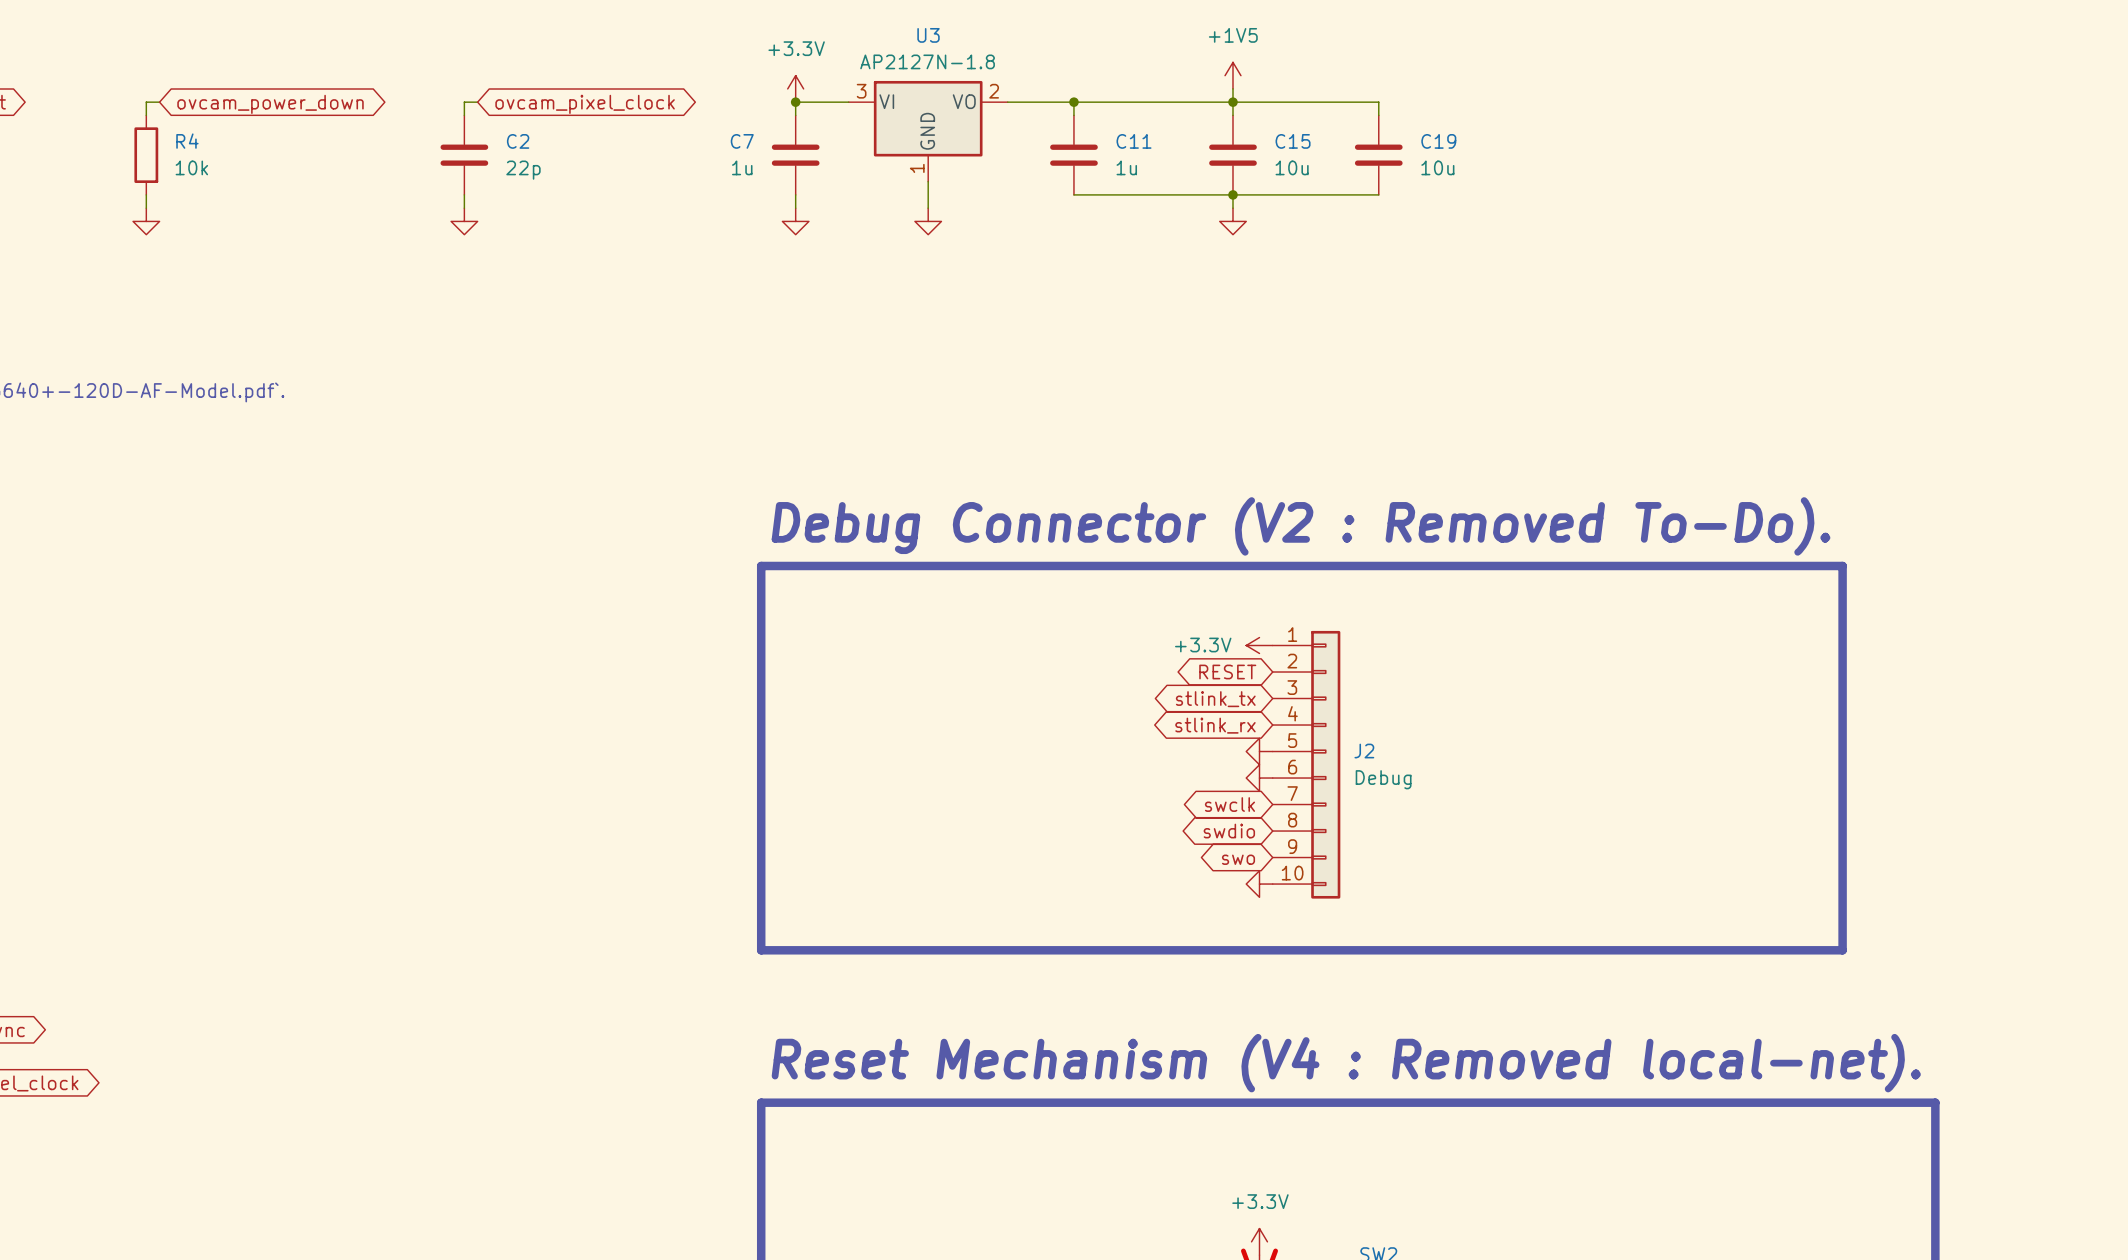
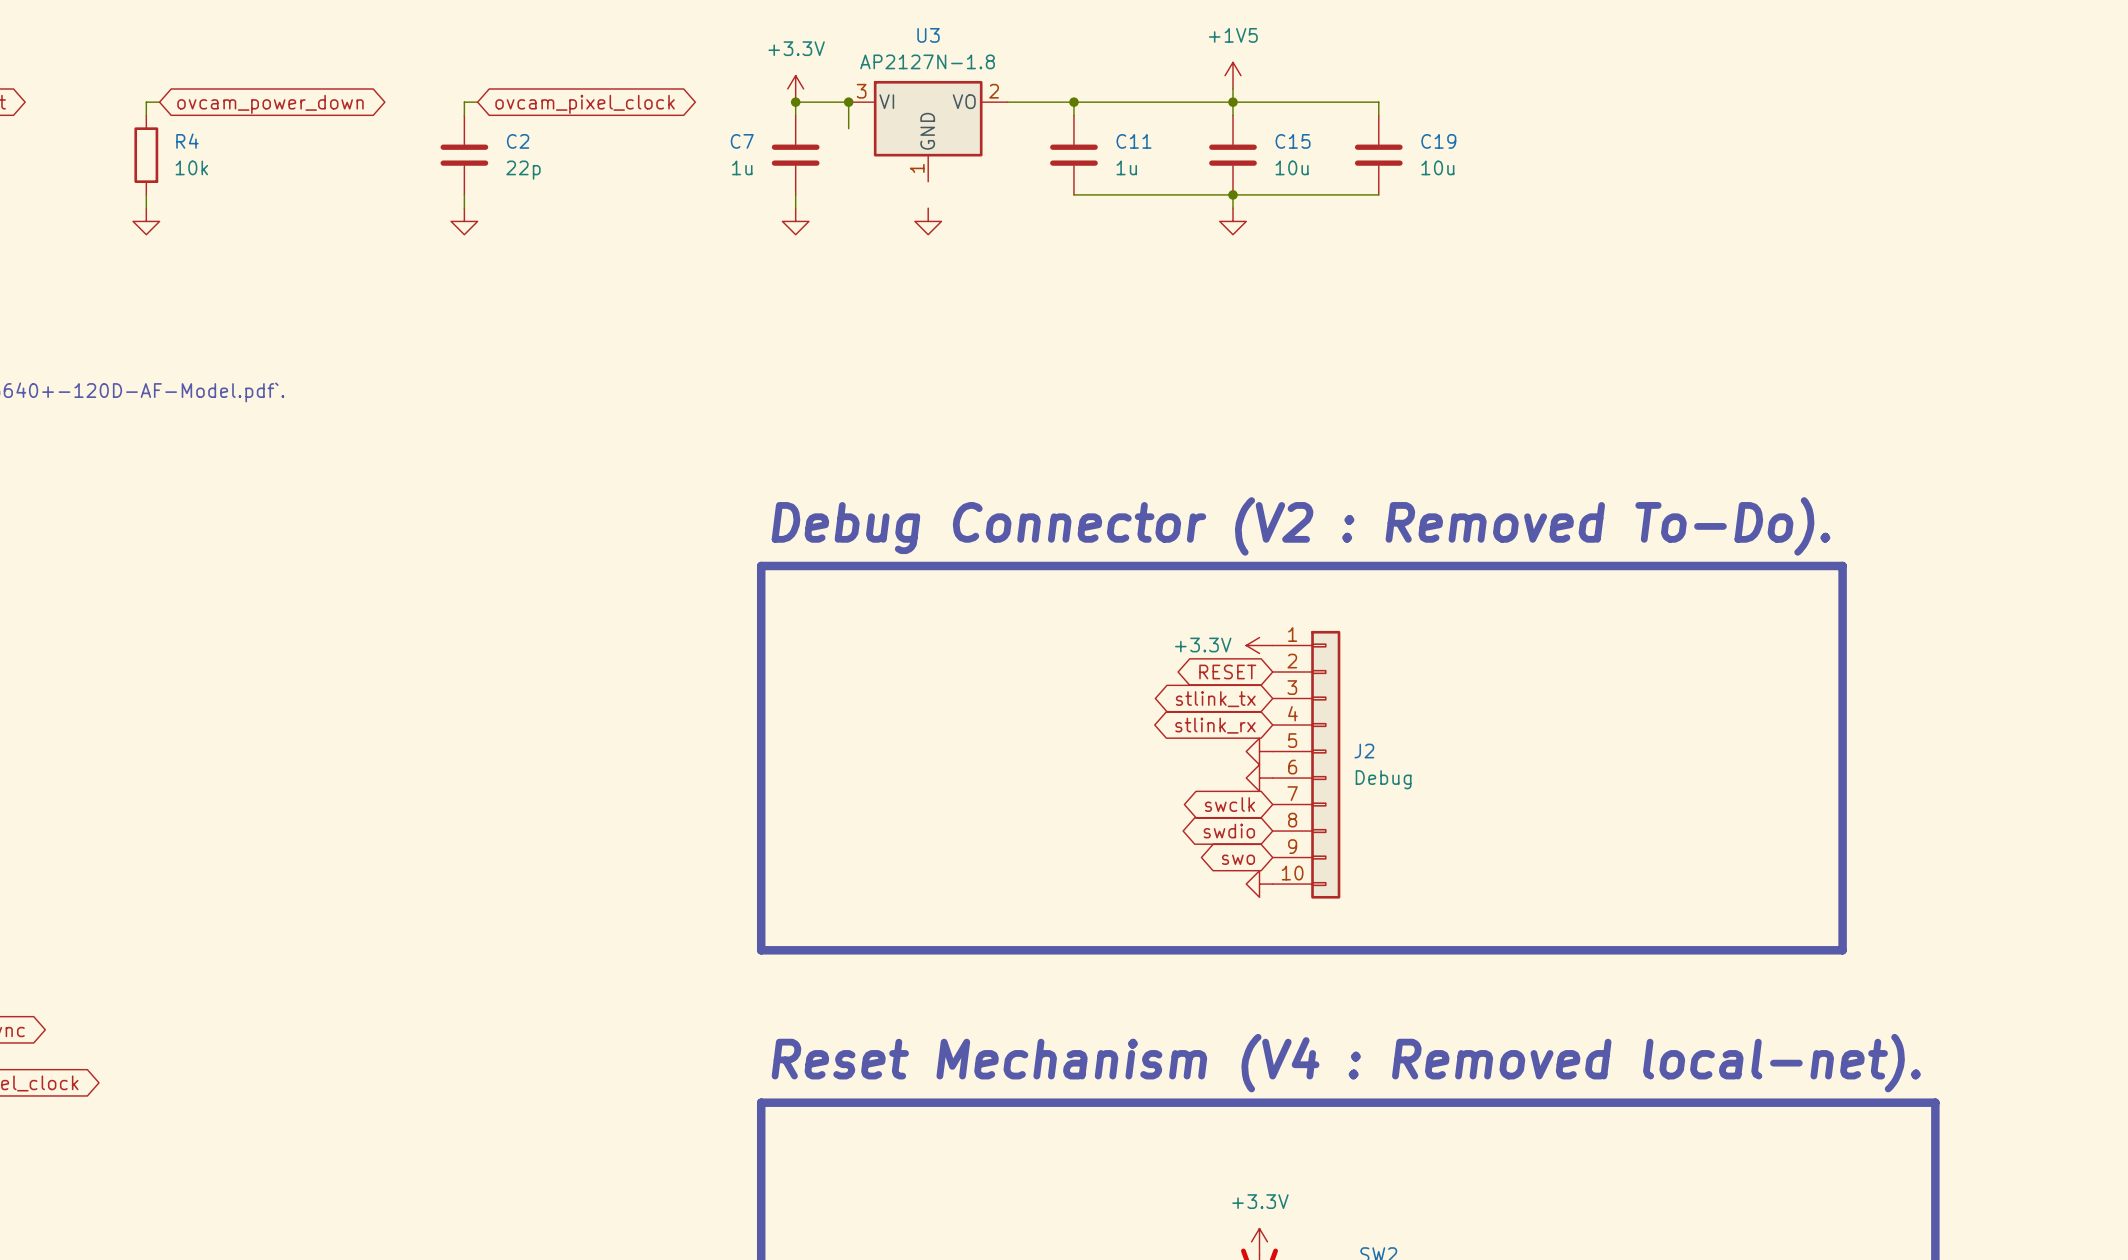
junction: none -> (848, 102)
wire: (928, 181) (928, 208) -> (848, 102) (848, 128)

